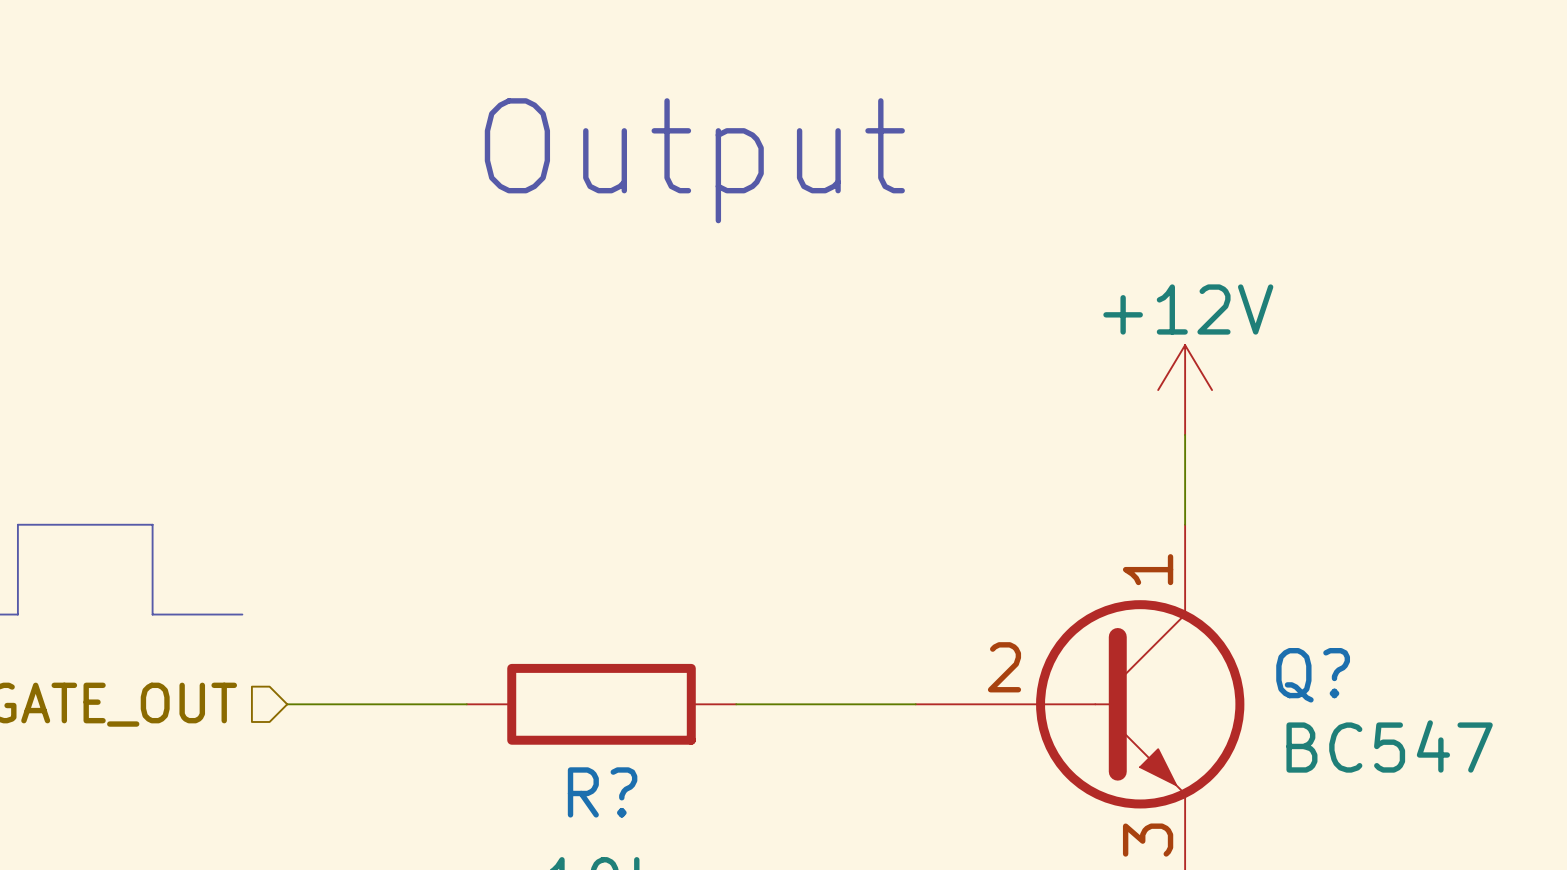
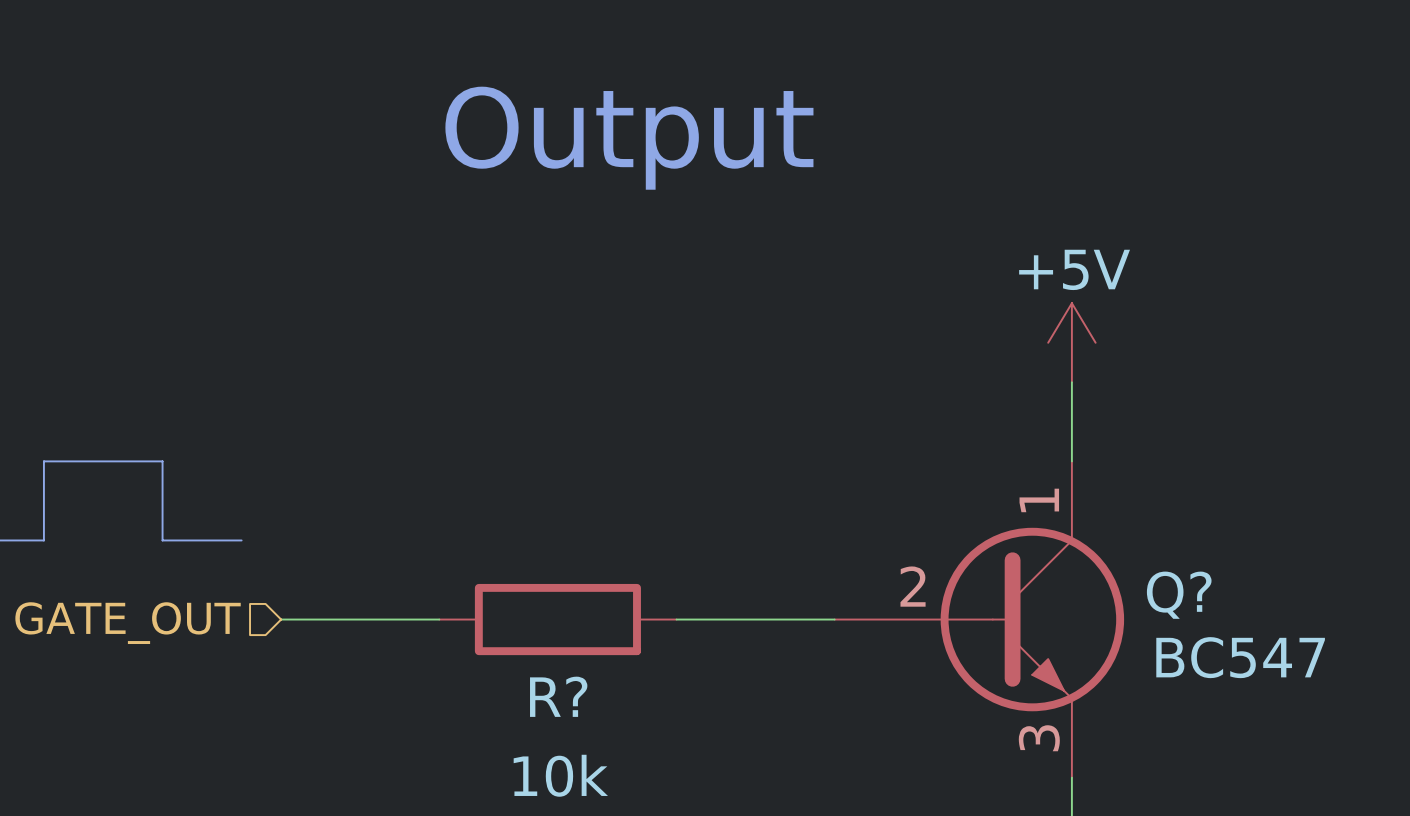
power symbol: +12V (1185, 390) -> +5V (1071, 342)

